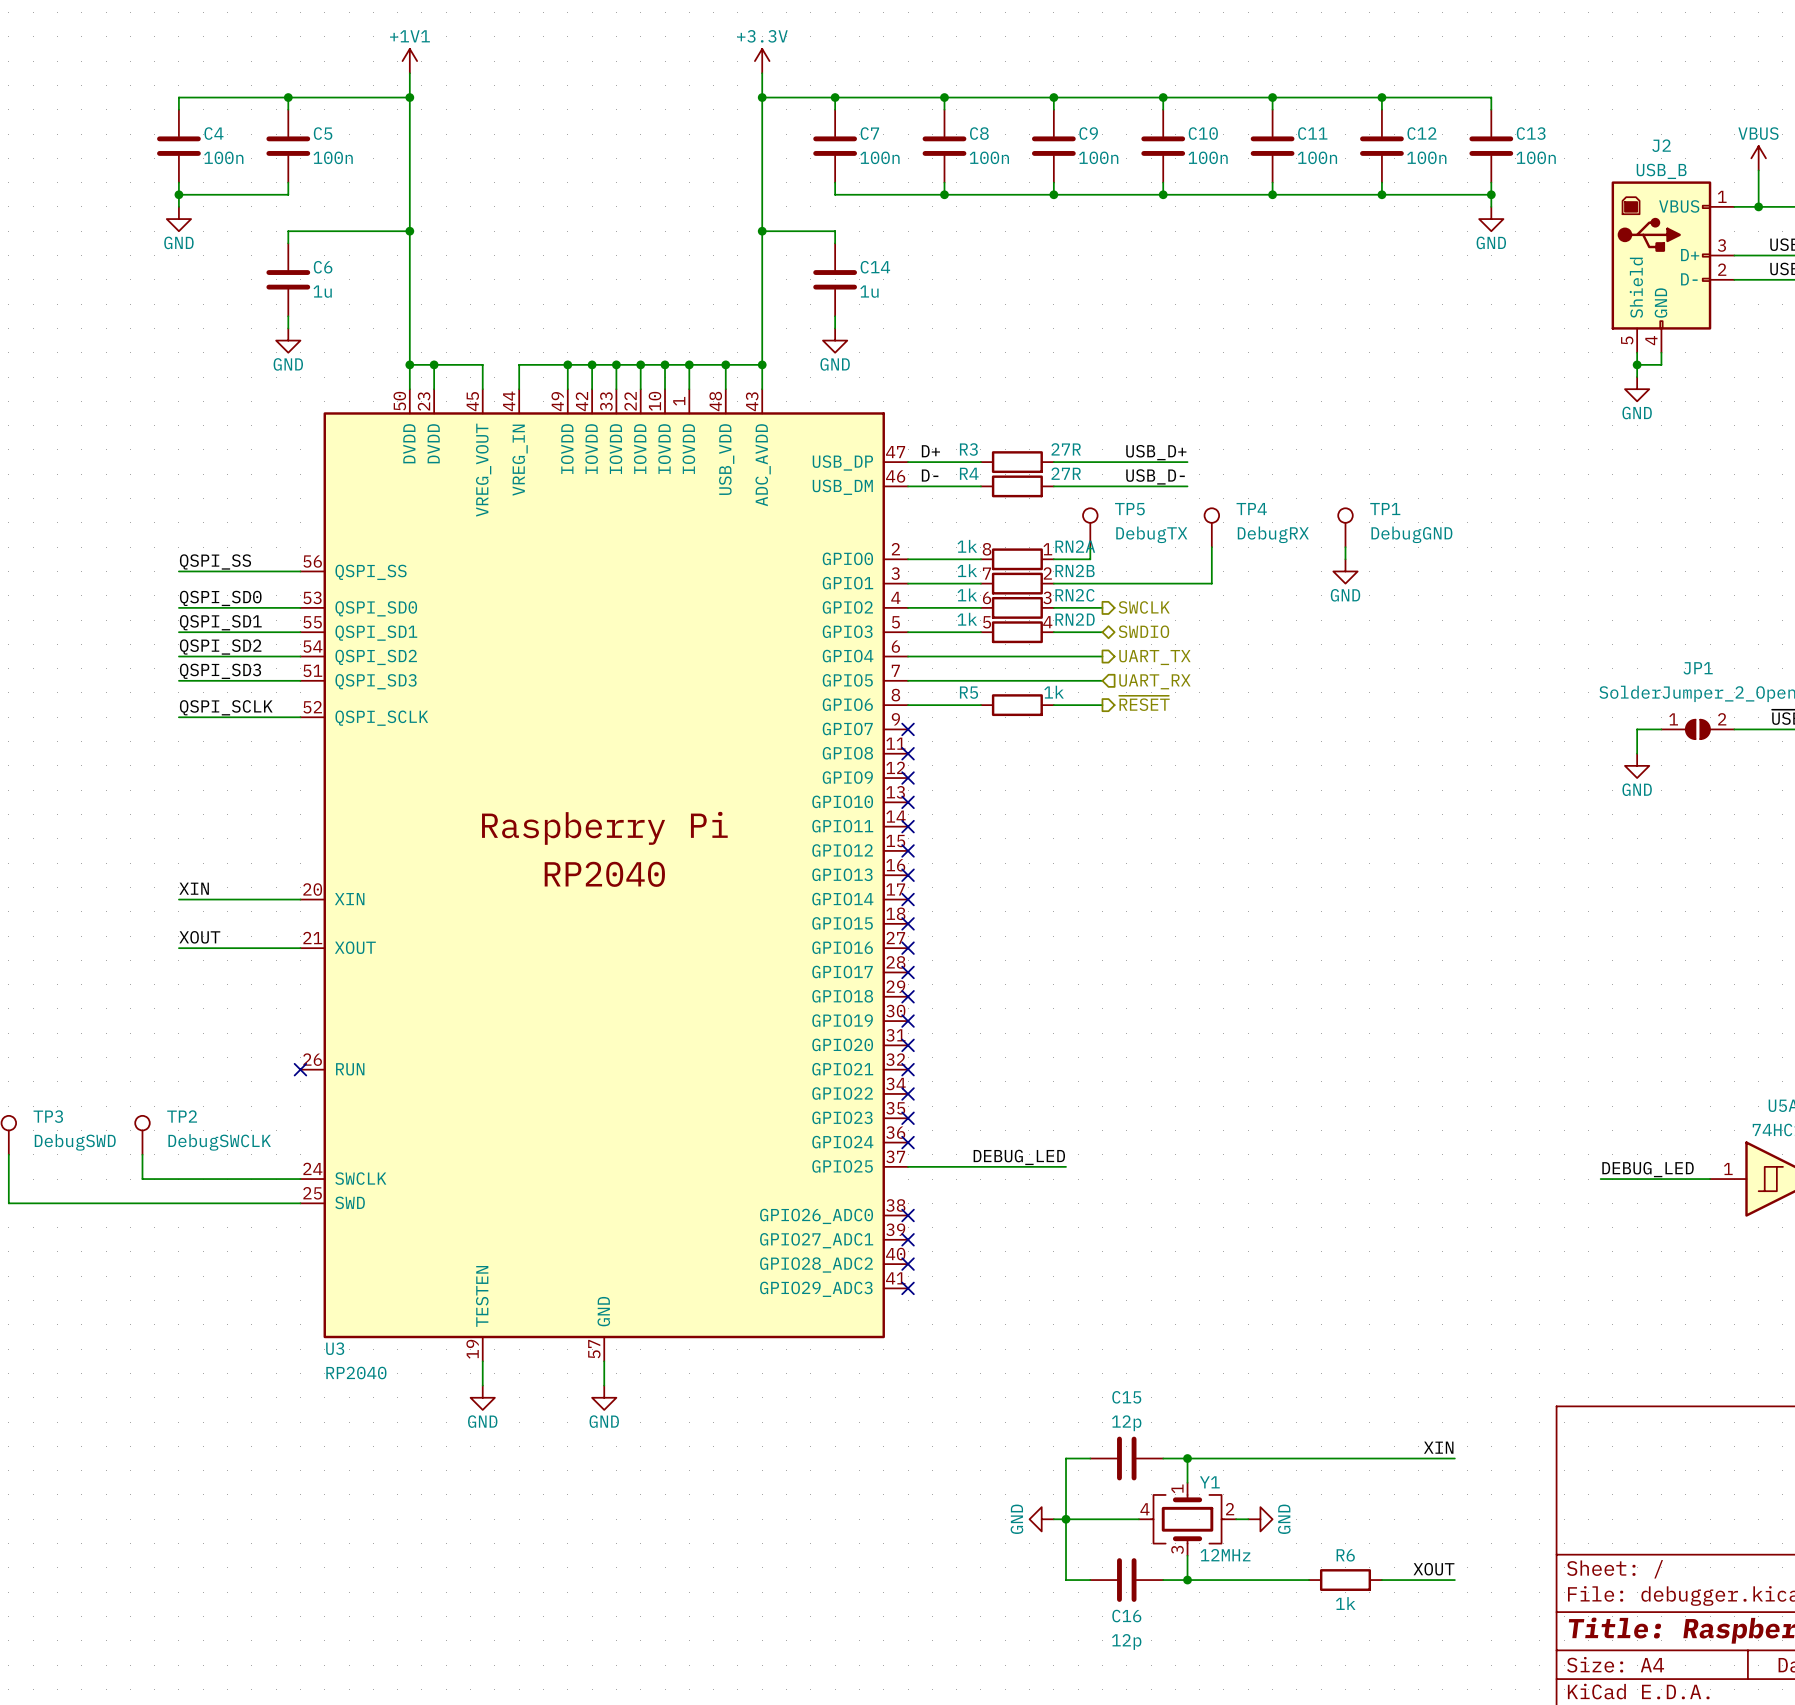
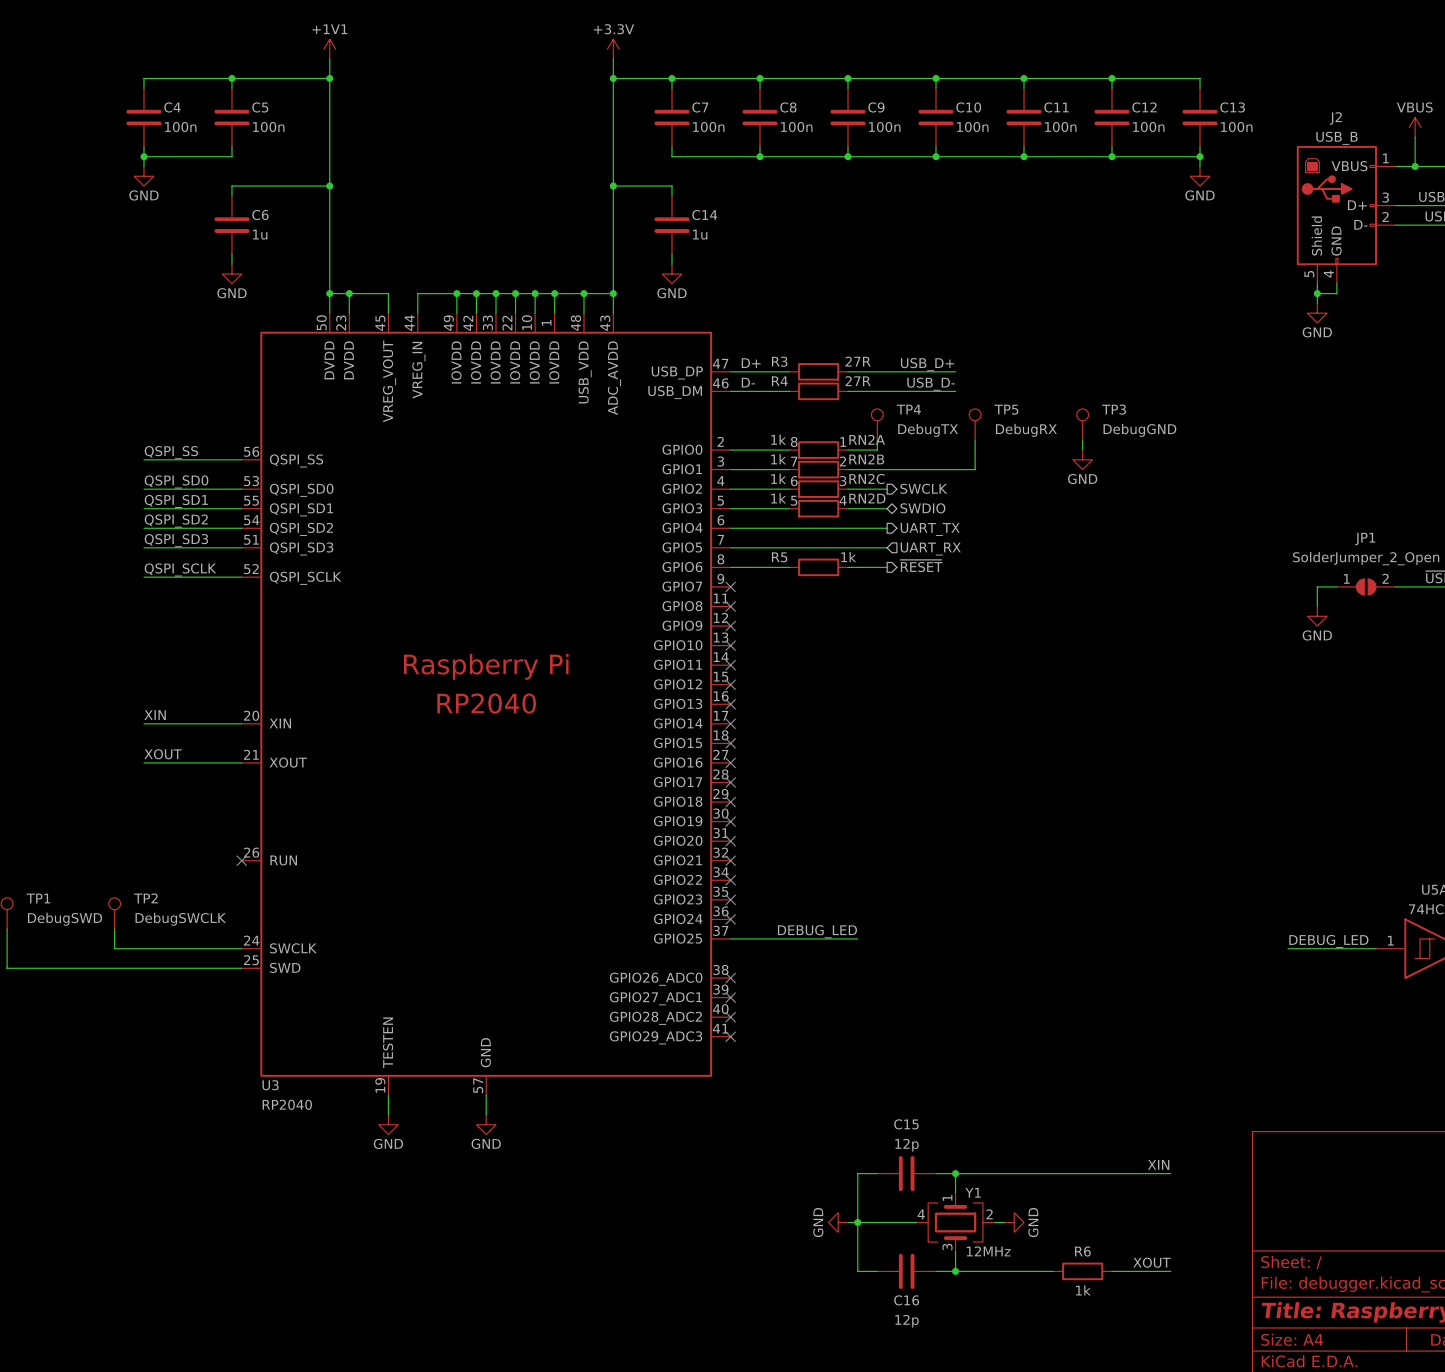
TP5 name: TP5 (1129, 509) -> TP4 (908, 409)
TP4 name: TP4 (1251, 509) -> TP5 (1006, 409)
TP1 name: TP1 (1385, 509) -> TP3 (1114, 409)
TP3 name: TP3 (48, 1116) -> TP1 (38, 898)

